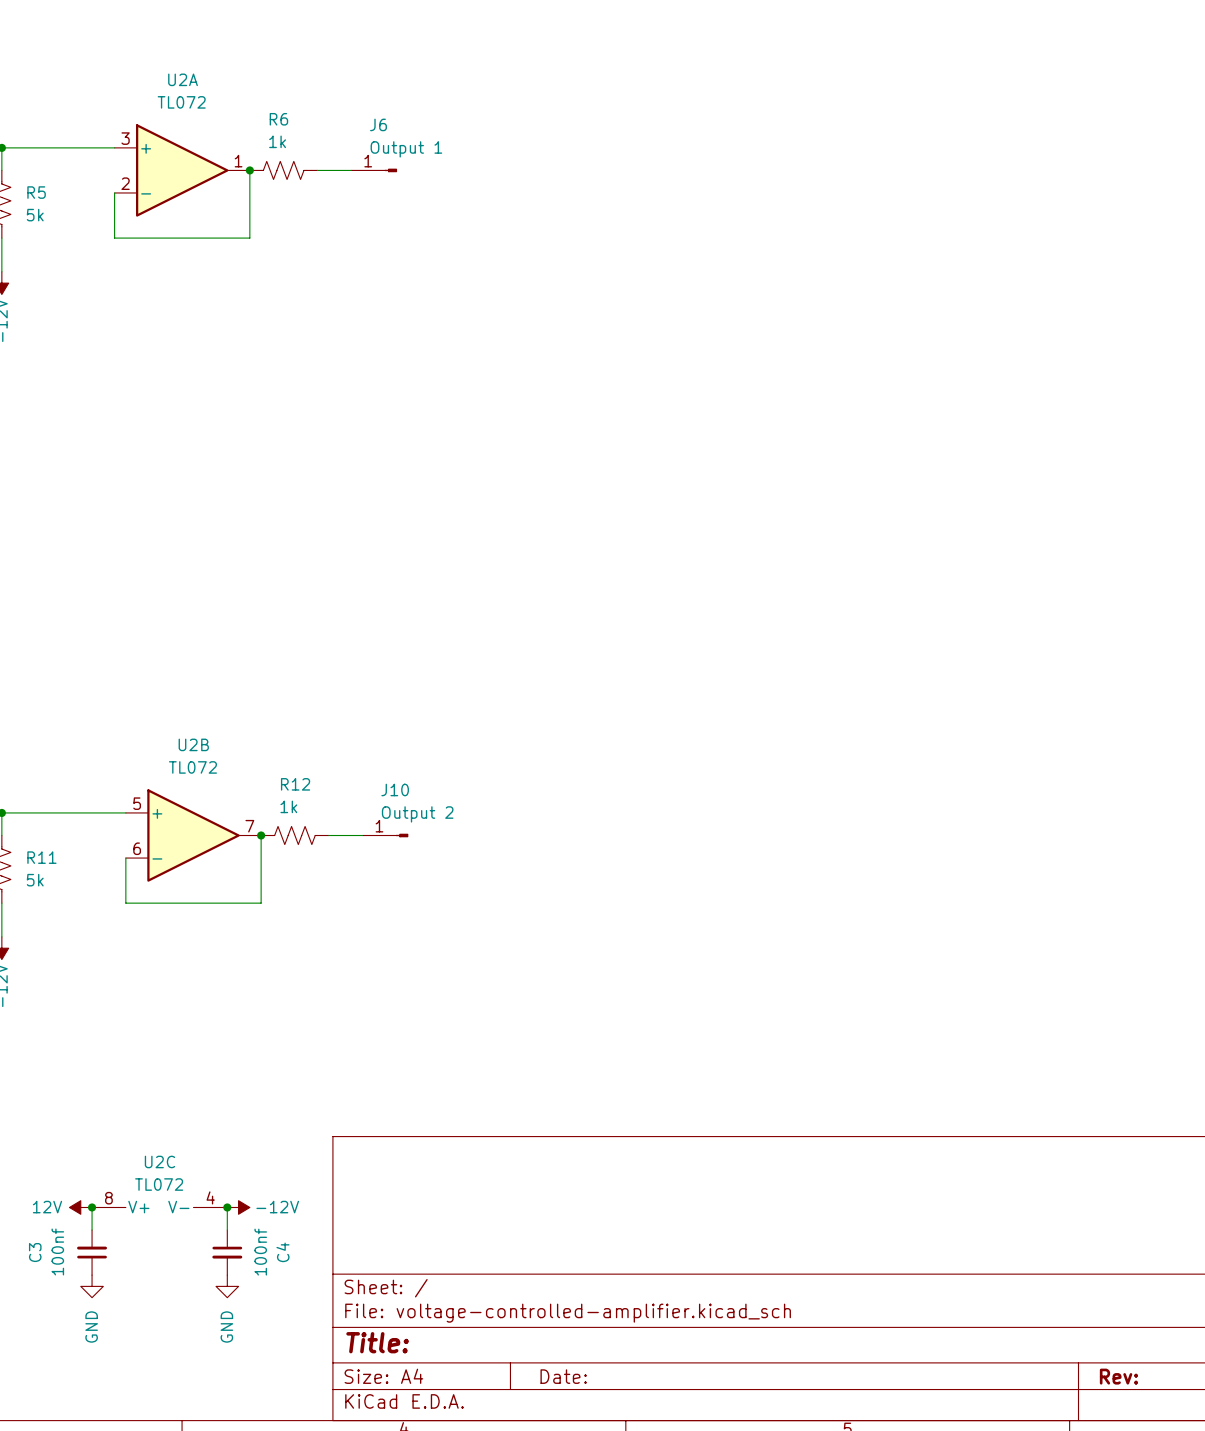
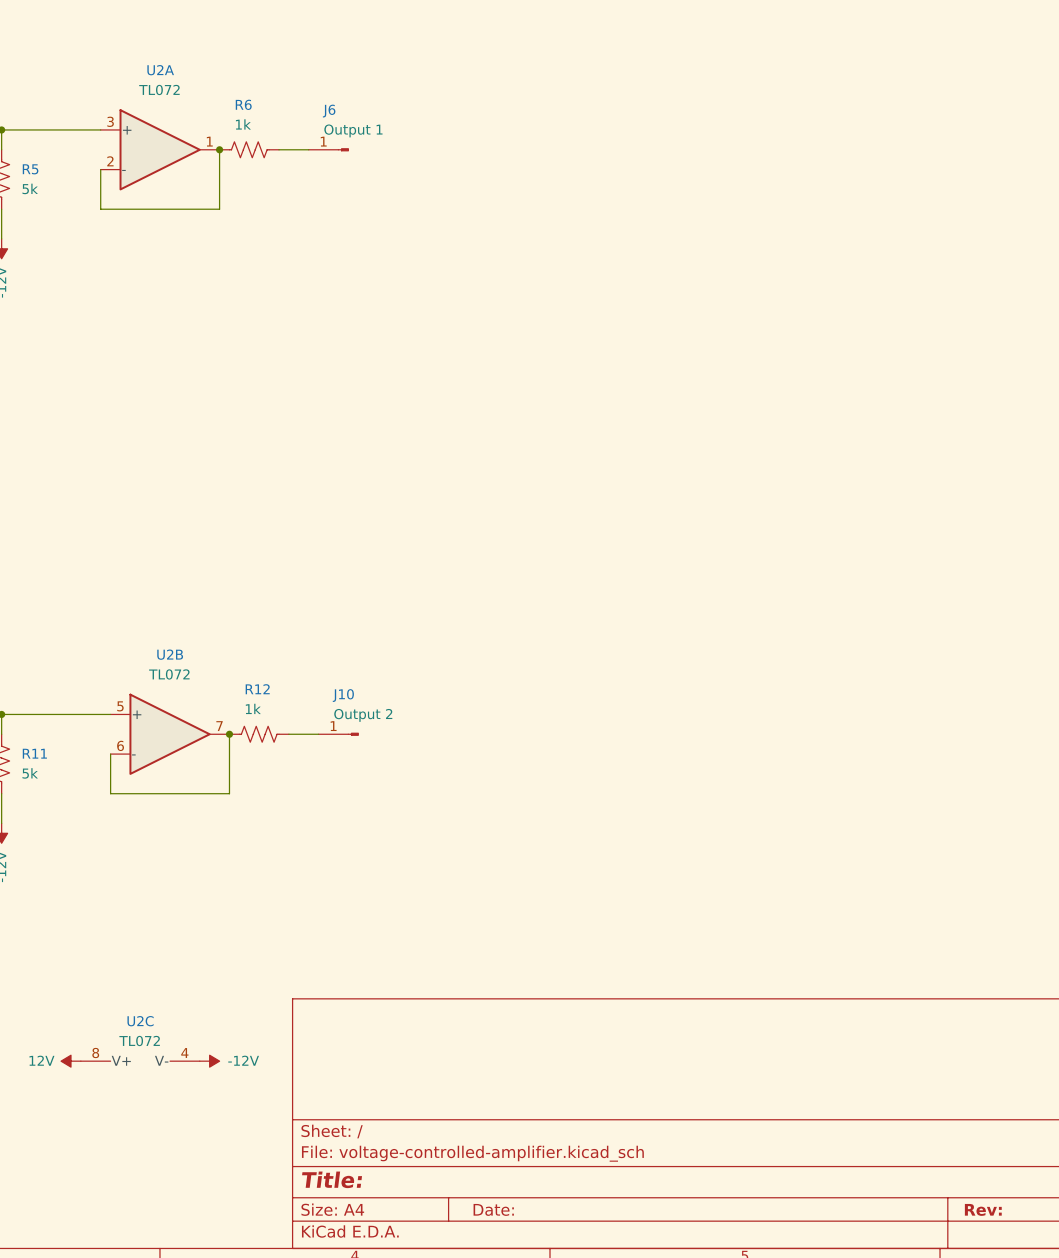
wire: (92, 1207) (92, 1230) -> none
junction: (92, 1207) -> none
wire: (227, 1207) (227, 1230) -> none
junction: (227, 1207) -> none
C3: 100nf (92, 1252) -> none
C4: 100nf (227, 1252) -> none
power symbol: GND (92, 1286) -> none
power symbol: GND (227, 1286) -> none

